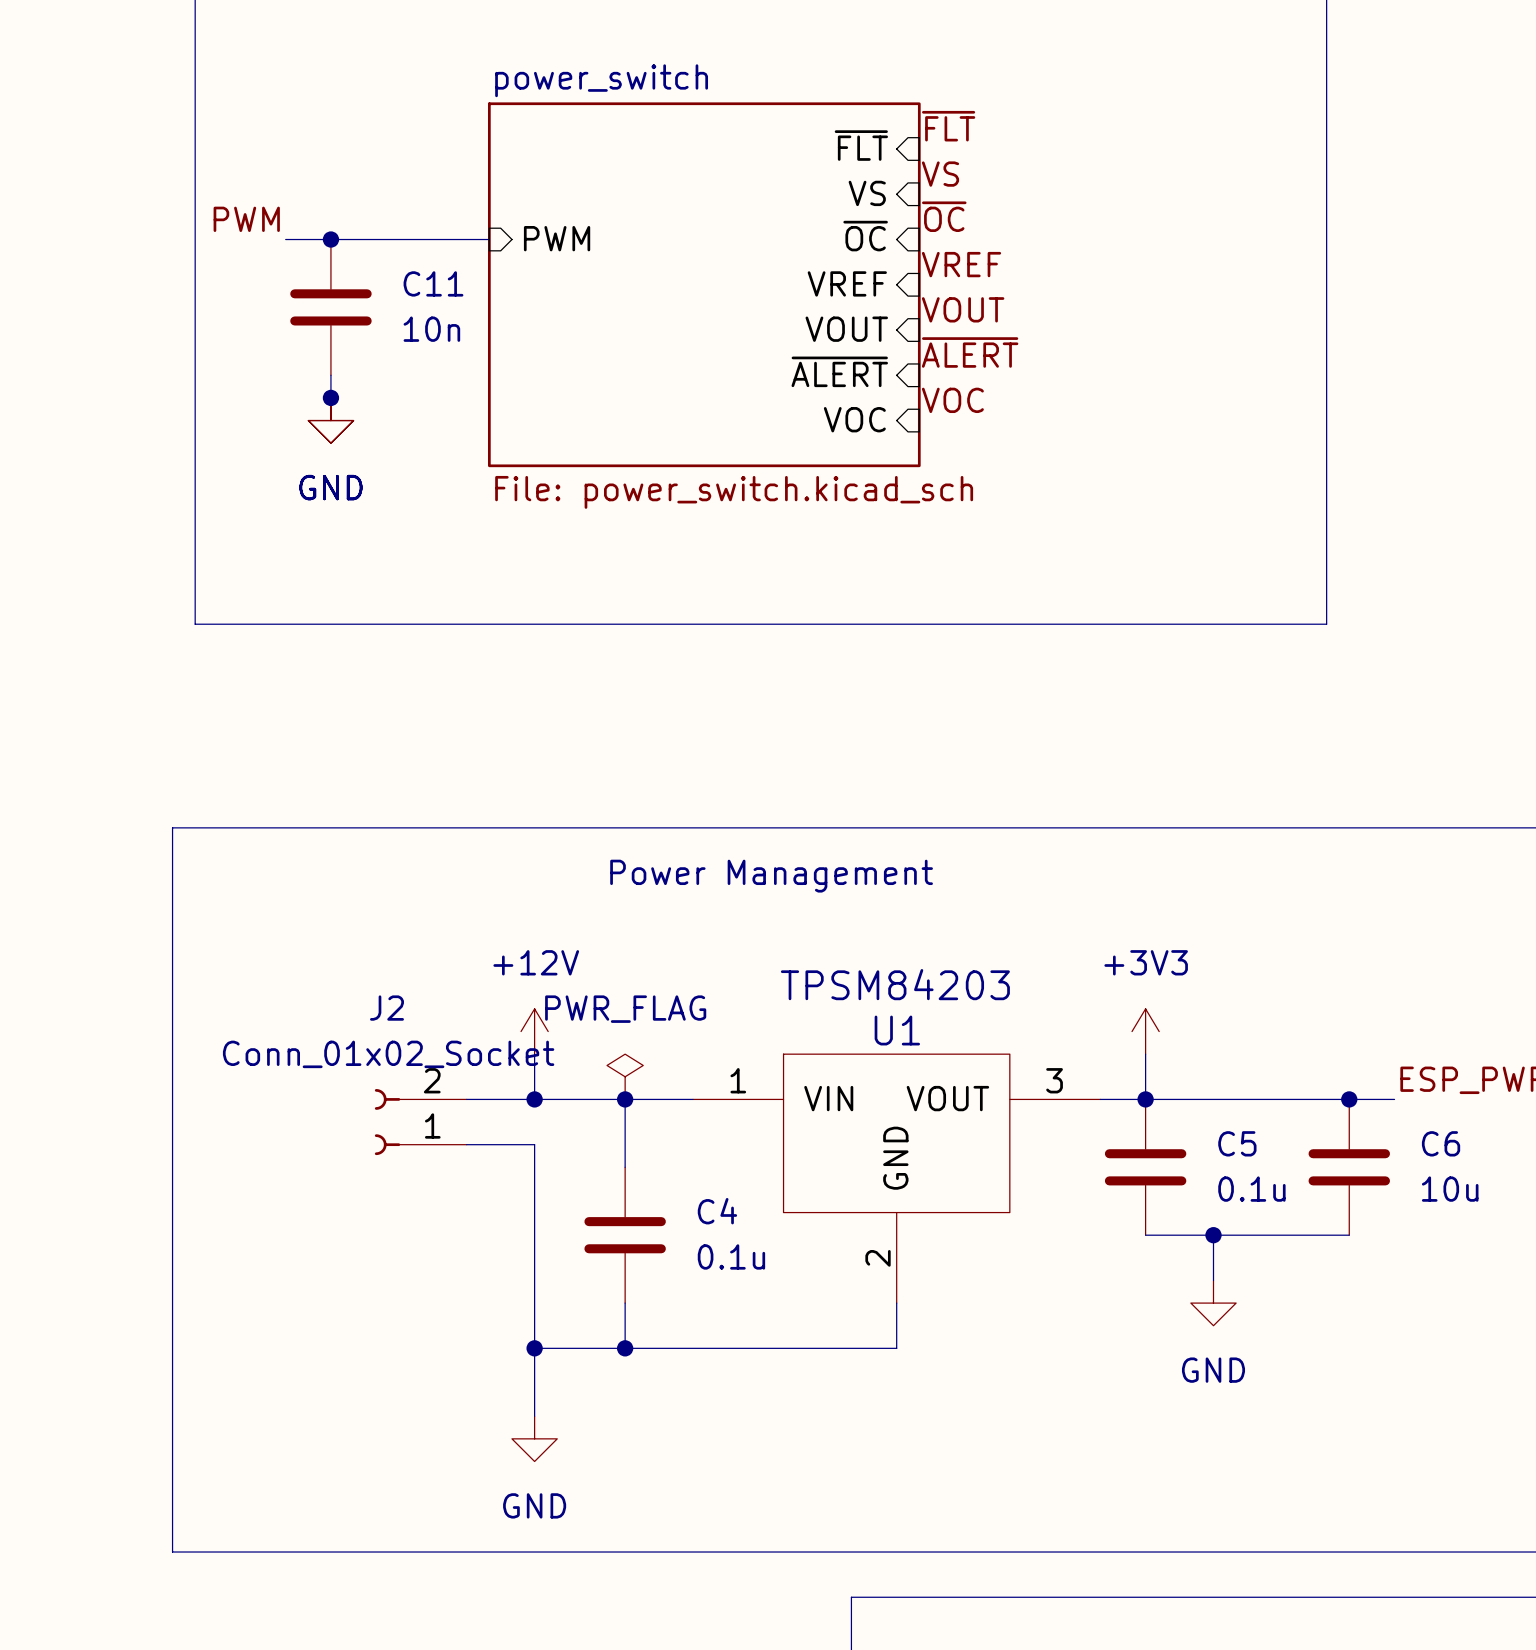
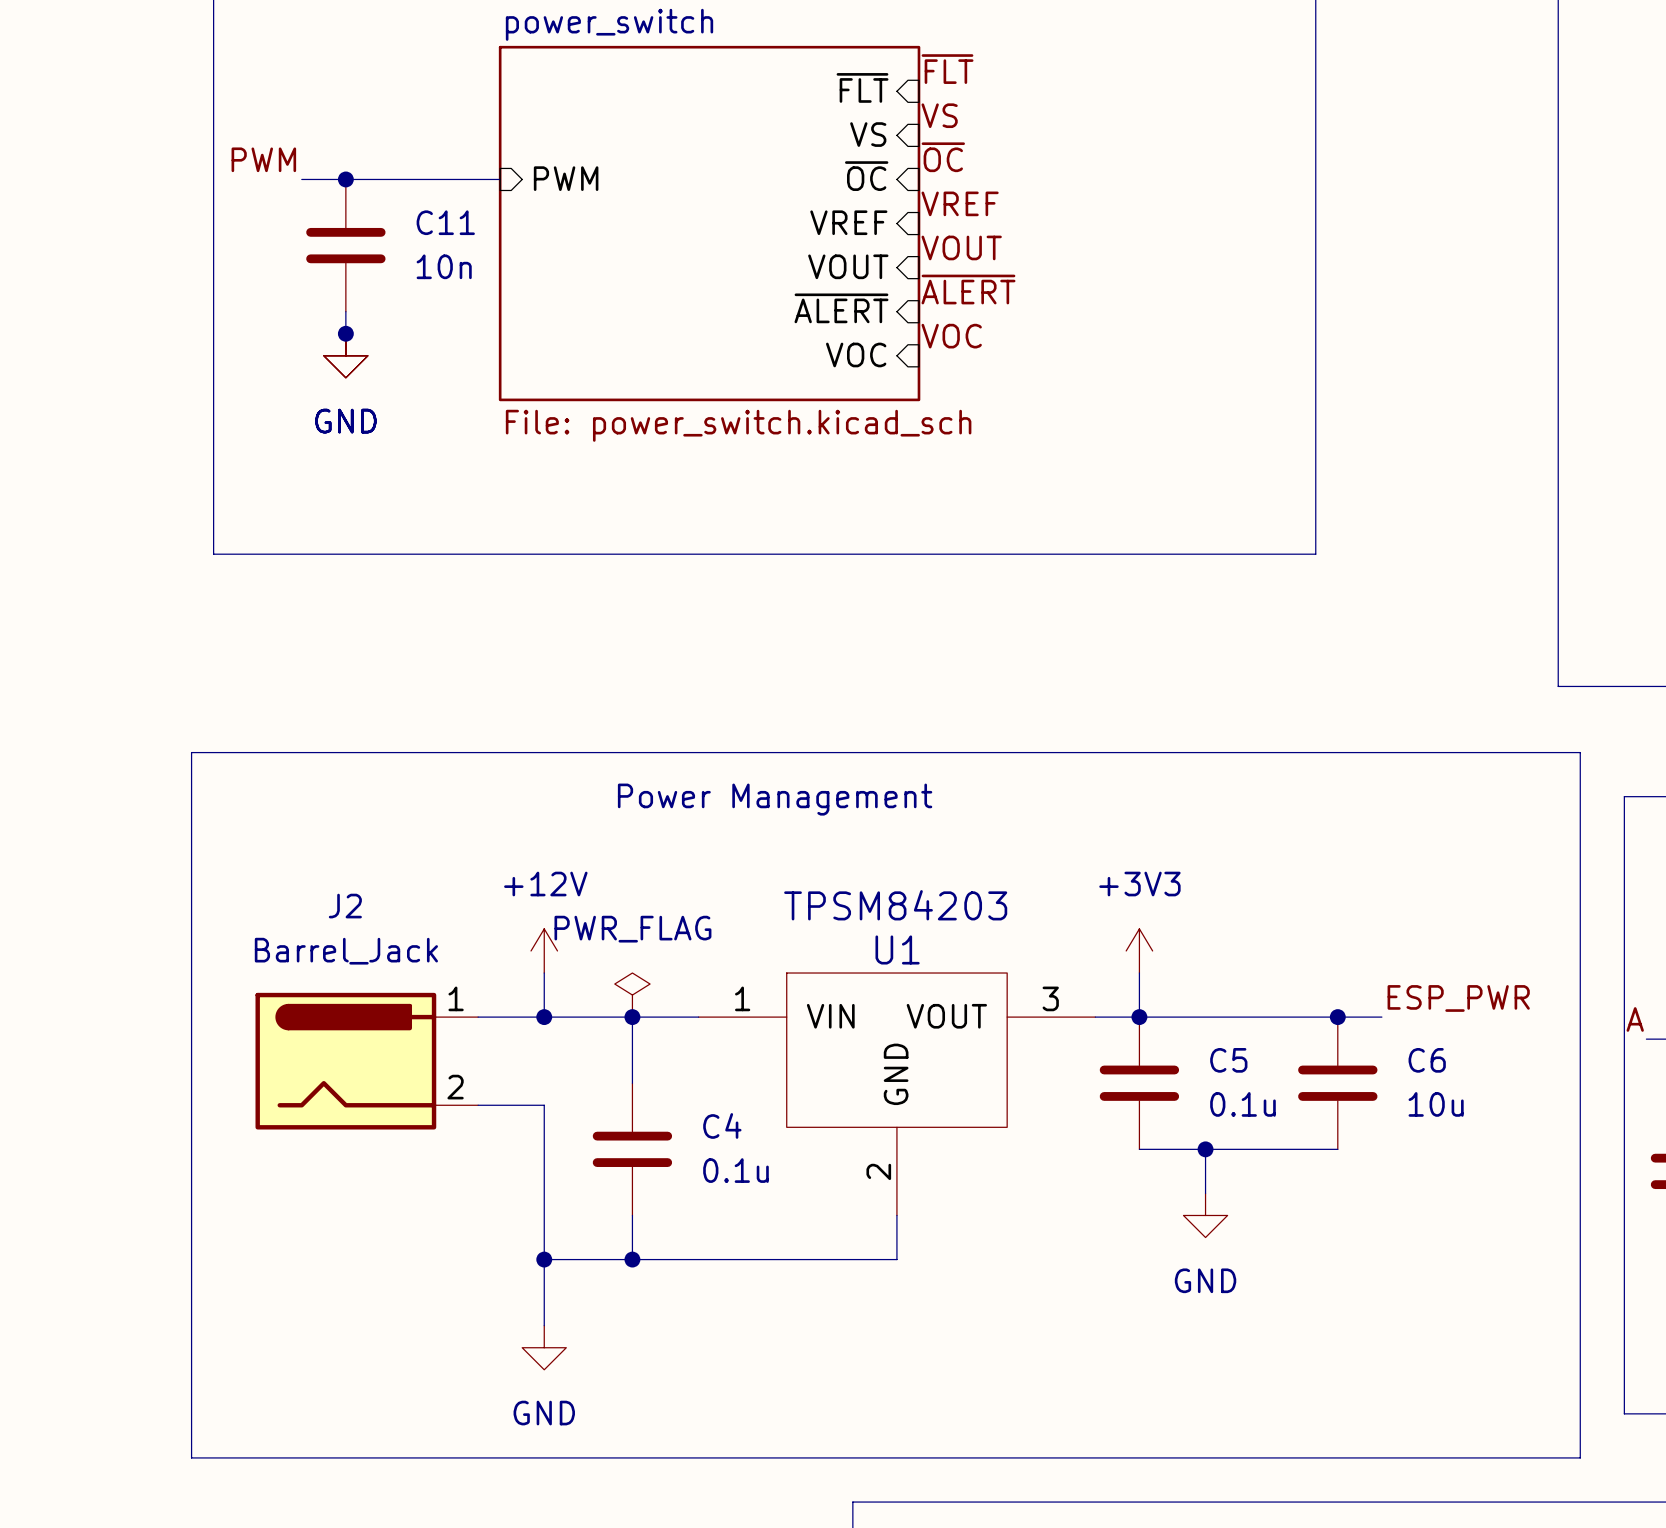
J2 name position: J2 (386, 1008) -> J2 (345, 906)
J2 value: Conn_01x02_Socket (388, 1054) -> Barrel_Jack (346, 951)
J2 symbol: [374, 1089, 467, 1156] -> [255, 992, 479, 1130]
wire: (466, 1144) (534, 1144) (534, 1189) -> (478, 1105) (544, 1105)

